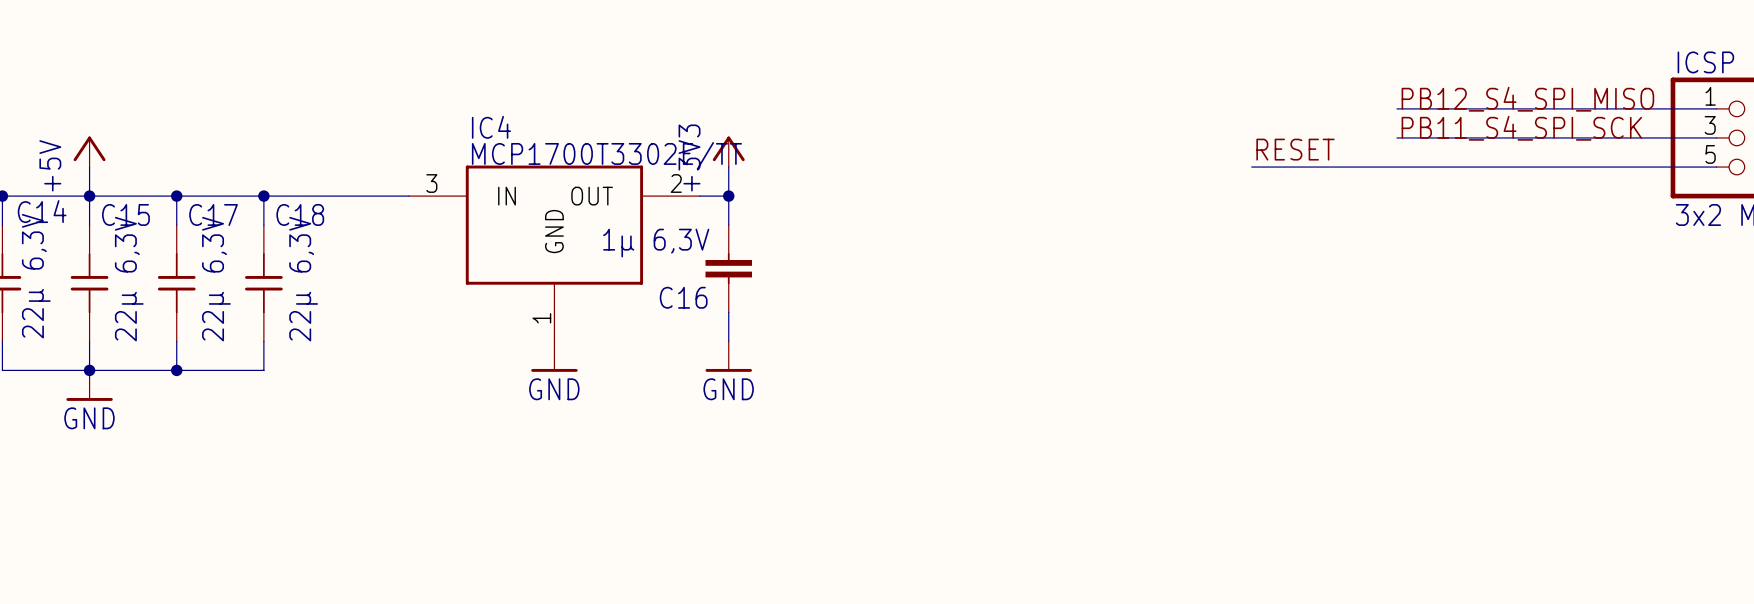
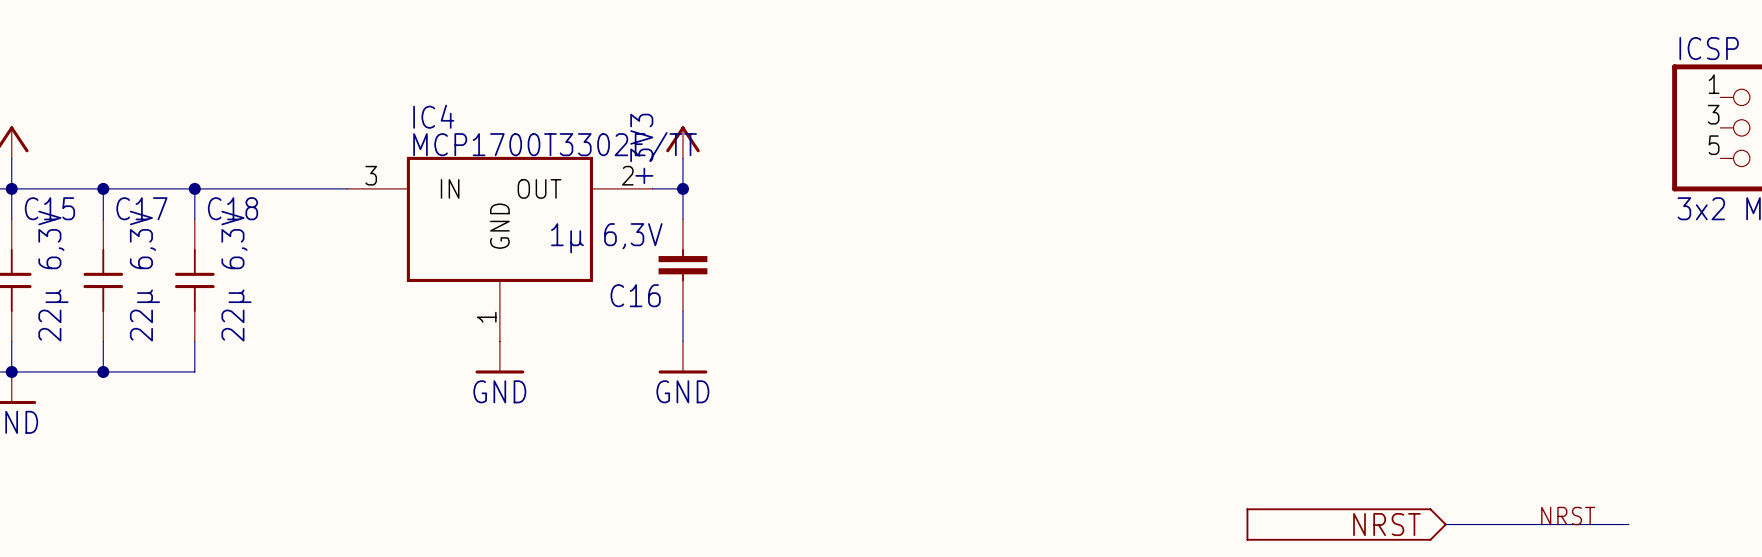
label: PB12_S4_SPI_MISO (1527, 99) -> none
wire: (1396, 108) (1716, 108) -> none
label: PB11_S4_SPI_SCK (1521, 128) -> none
wire: (1396, 137) (1716, 137) -> none
label: RESET (1295, 149) -> none
wire: (1251, 167) (1716, 167) -> none
label: none -> NRST (1568, 515)
part: none -> NRST (1346, 524)
wire: none -> (1445, 524) (1628, 524)

